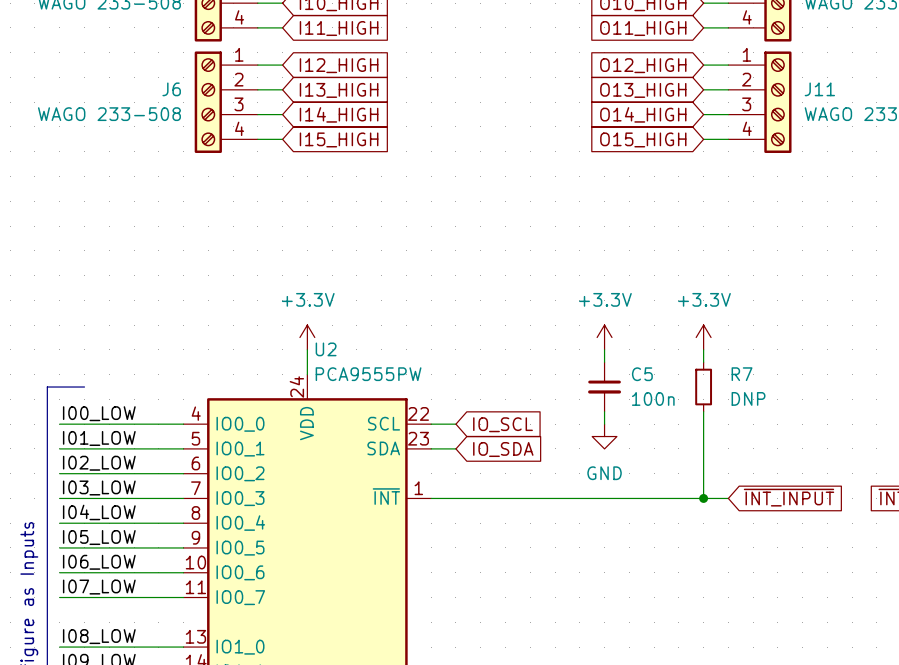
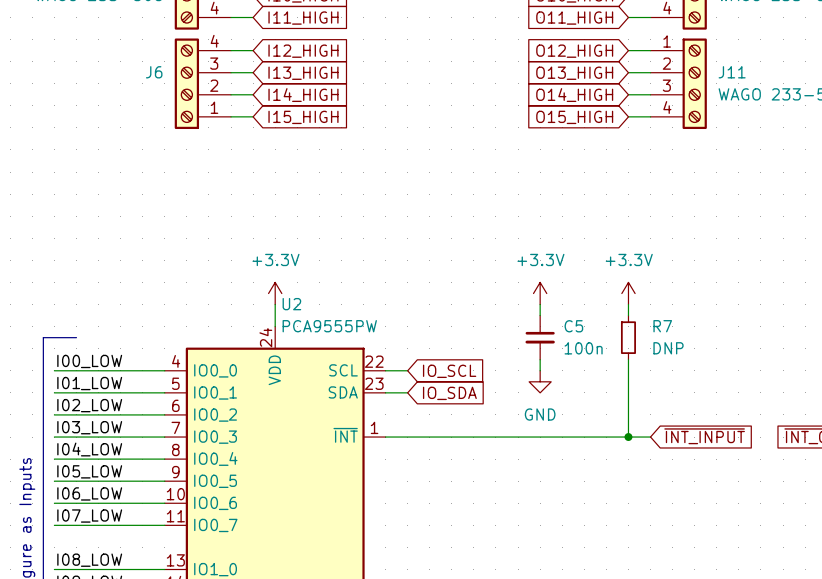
J6 flip: as is (208, 102) -> up-down (186, 83)
J6 value: WAGO 233-508 (109, 114) -> none

